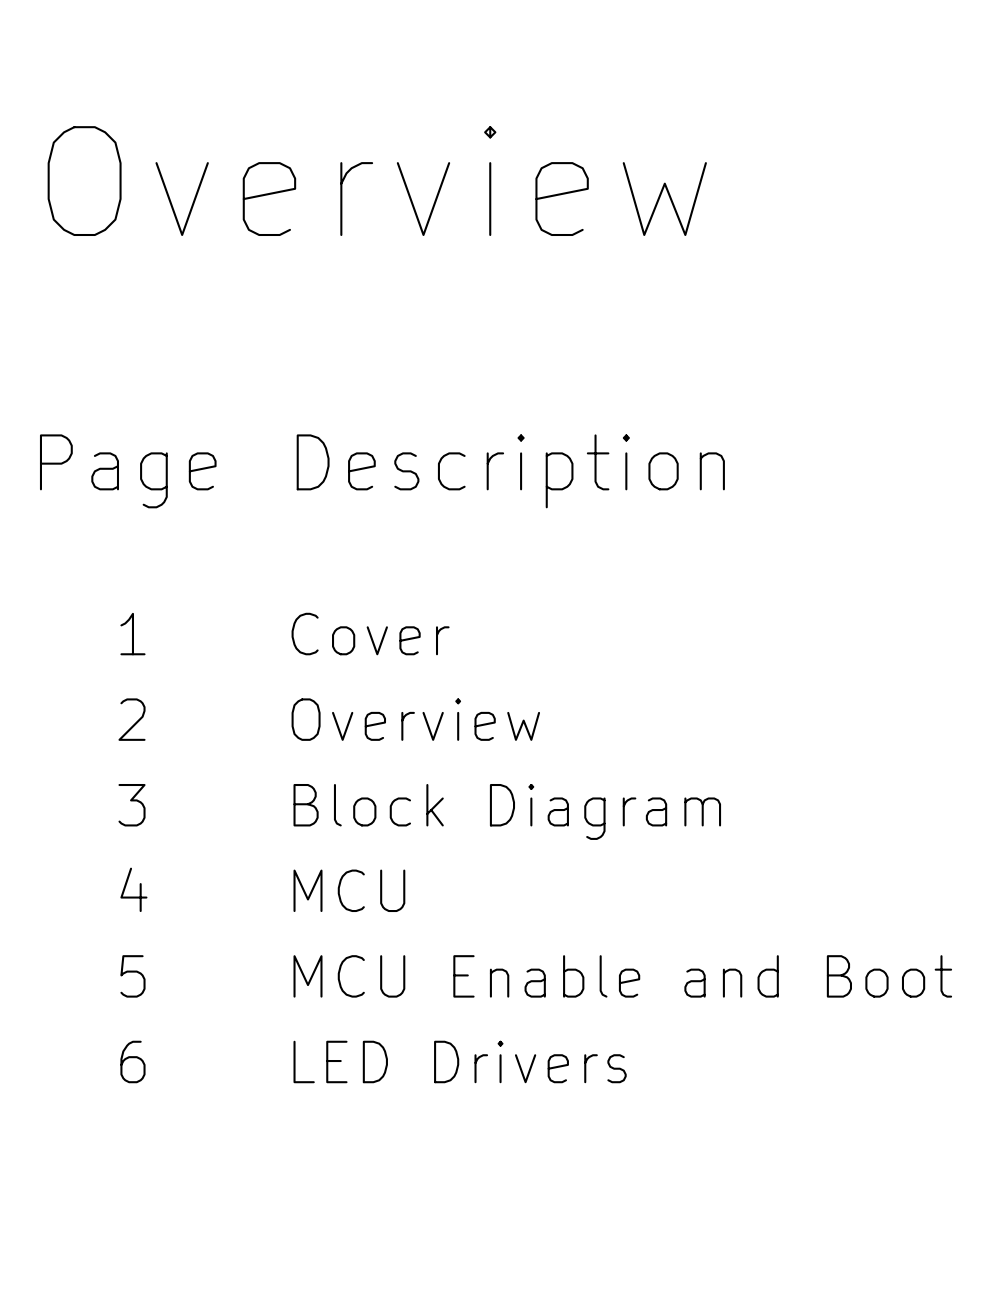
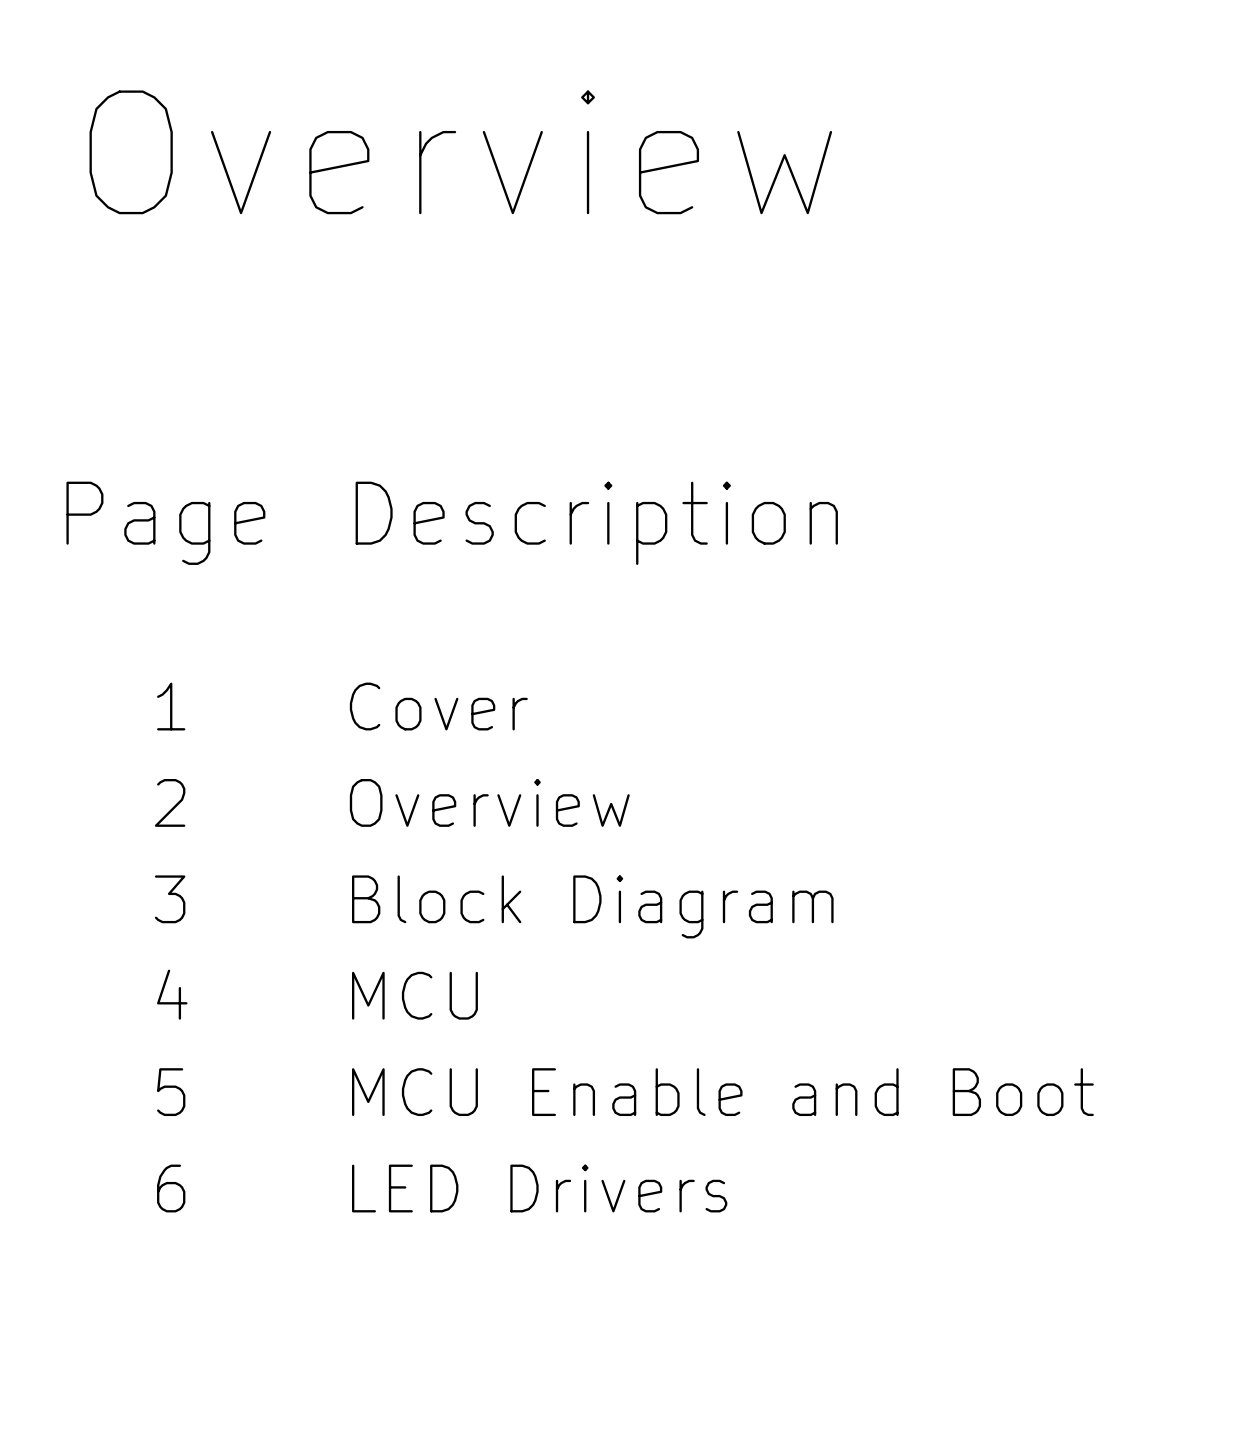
text position: Overview (377, 181) -> Overview (460, 152)

